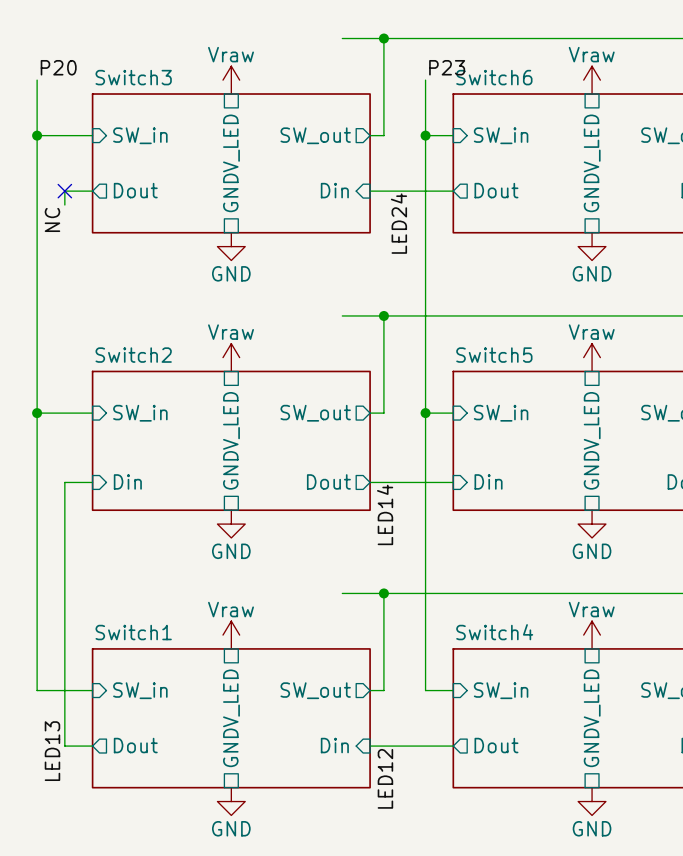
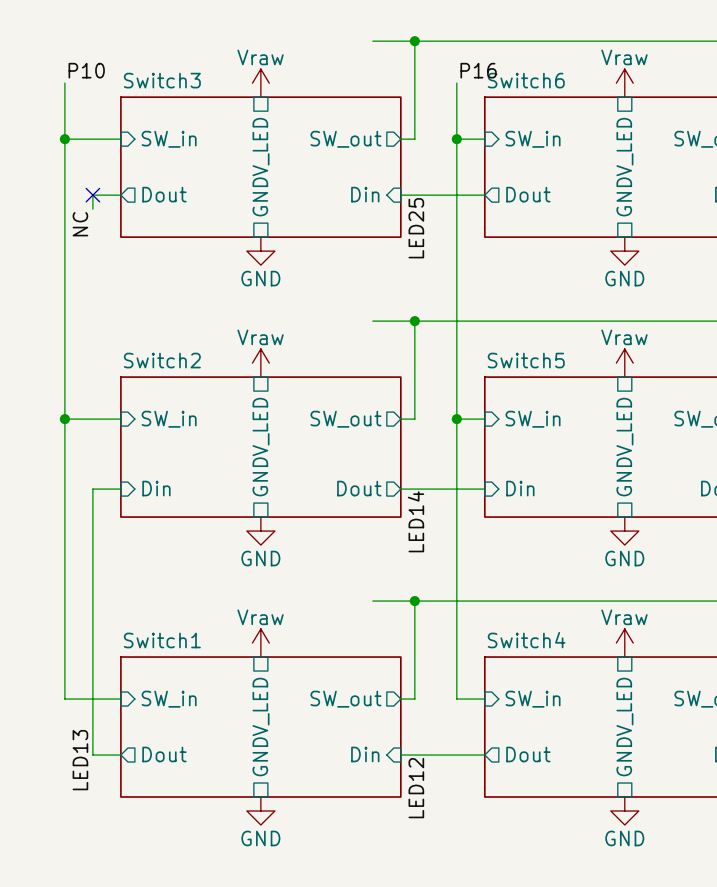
label: P20 (58, 67) -> P10 (86, 70)
label: P23 (447, 67) -> P16 (478, 70)
label: LED24 (398, 223) -> LED25 (416, 228)

